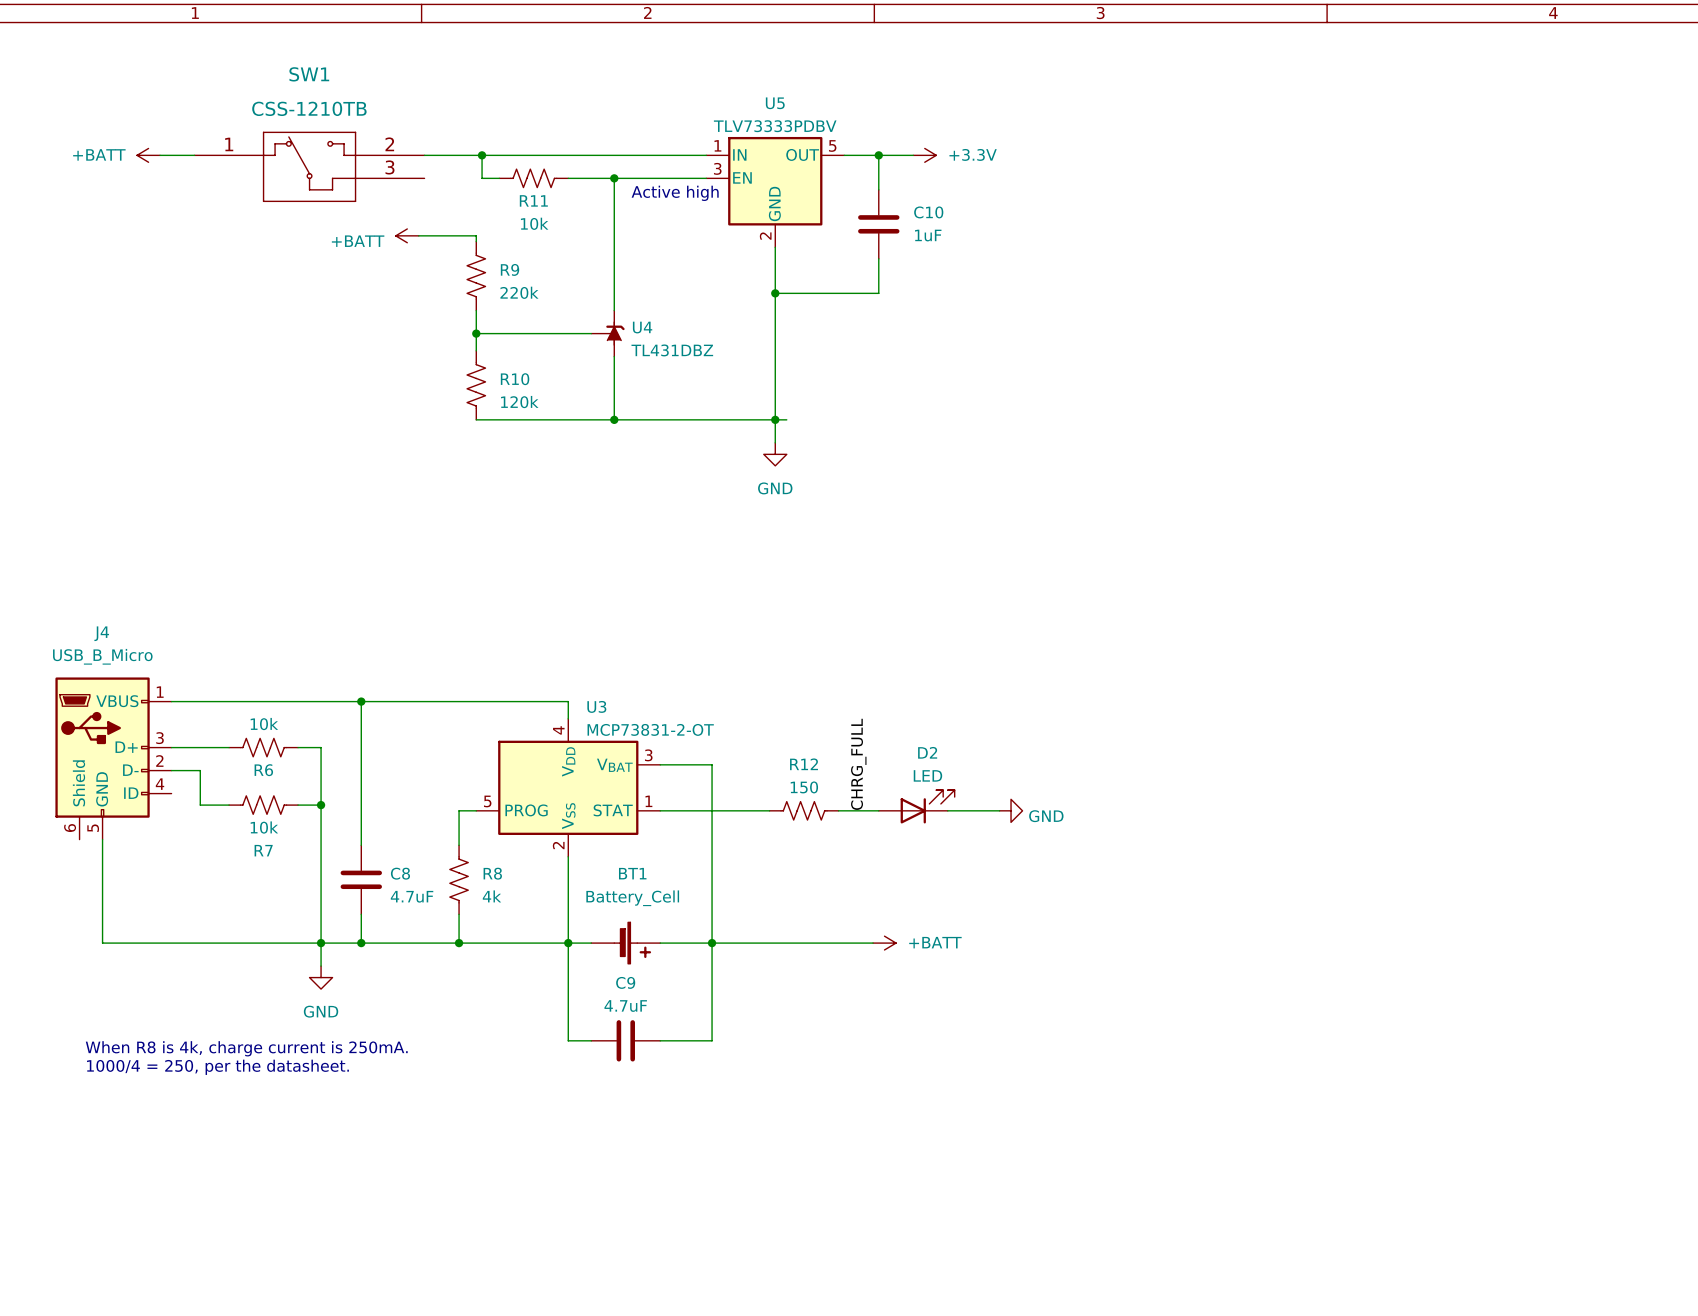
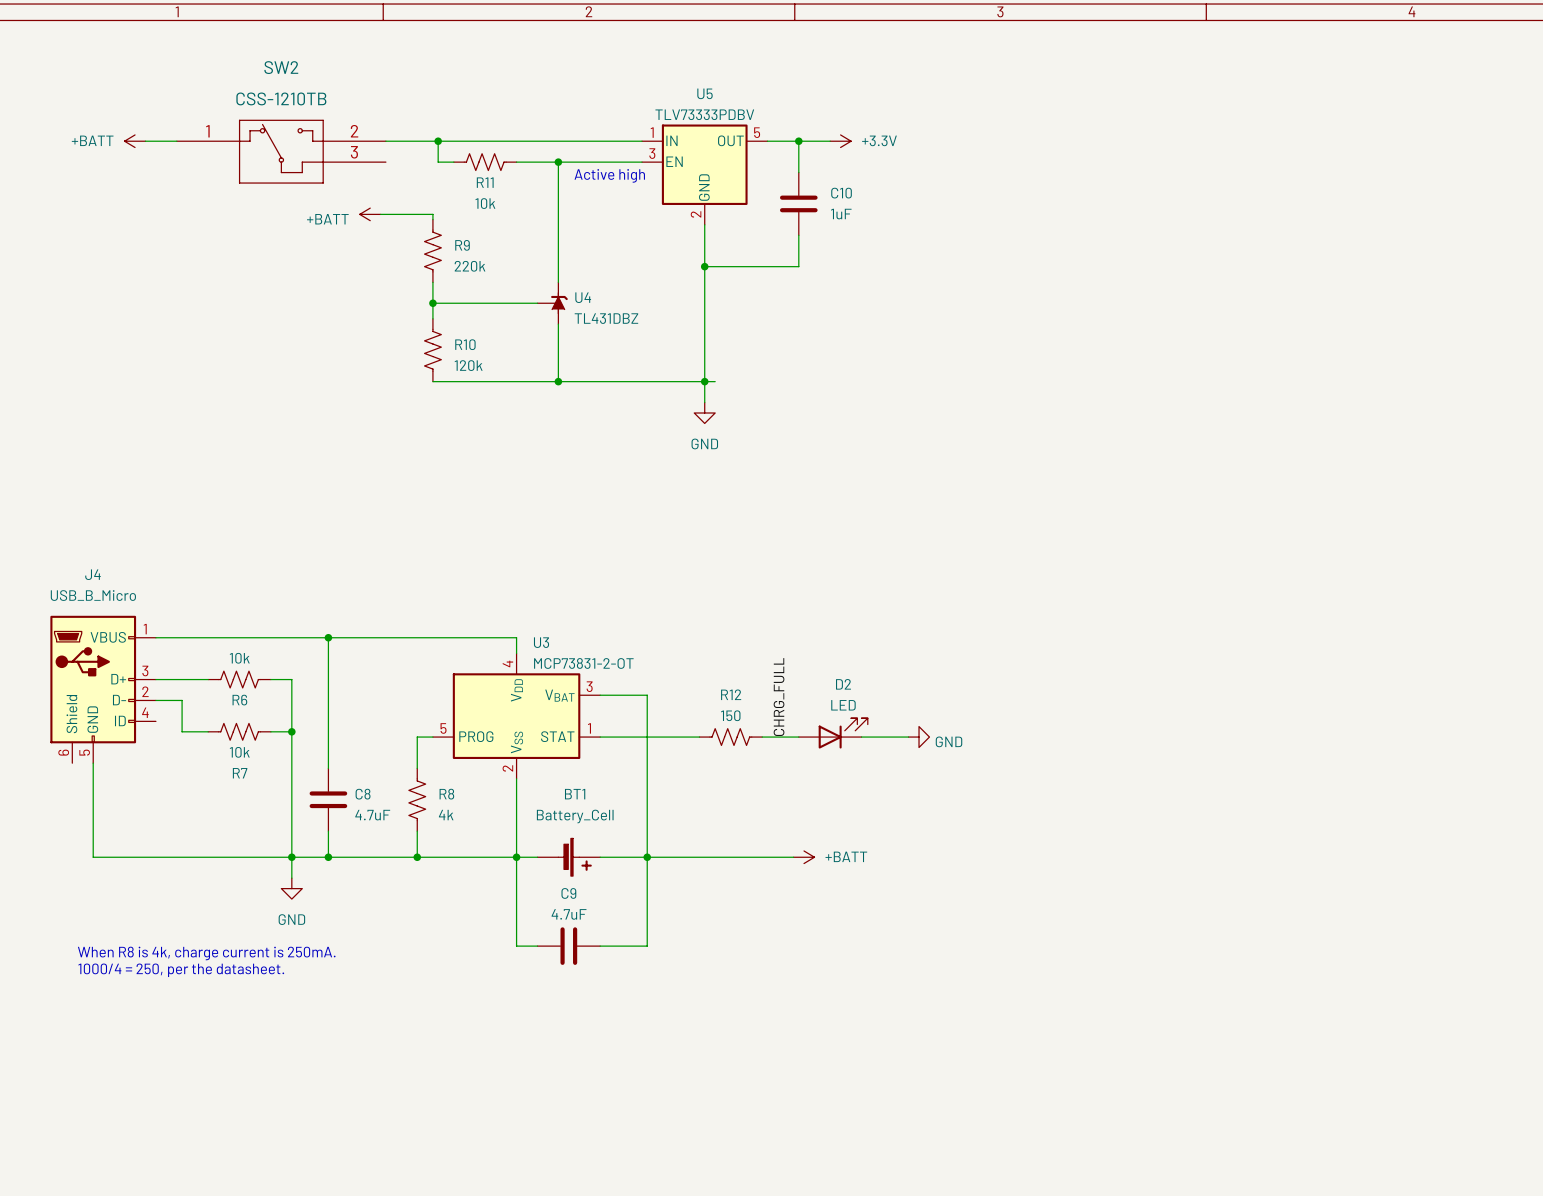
SW1 name: SW1 (309, 74) -> SW2 (281, 67)

